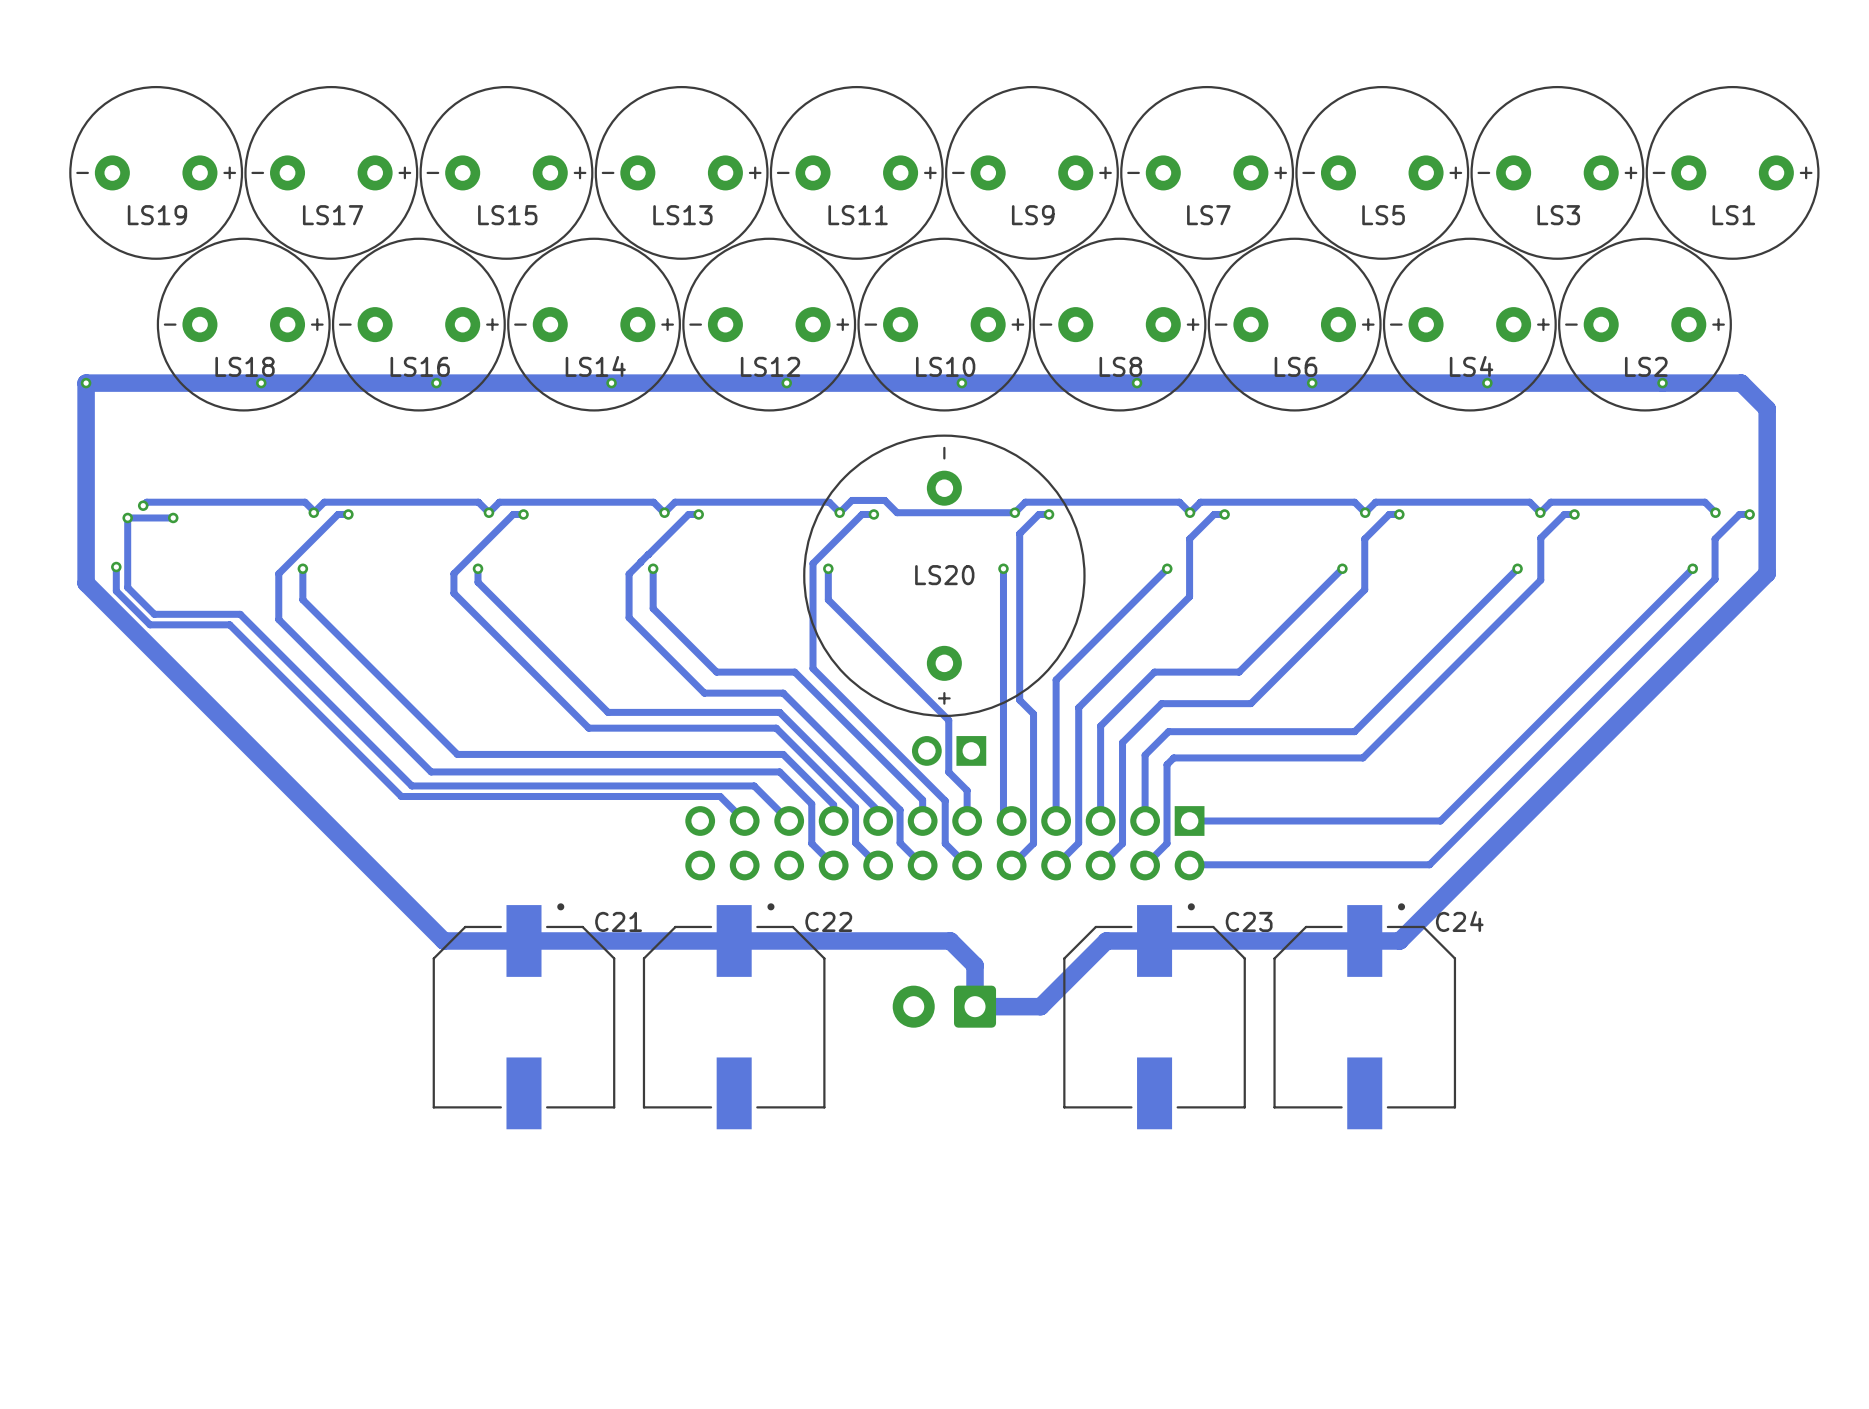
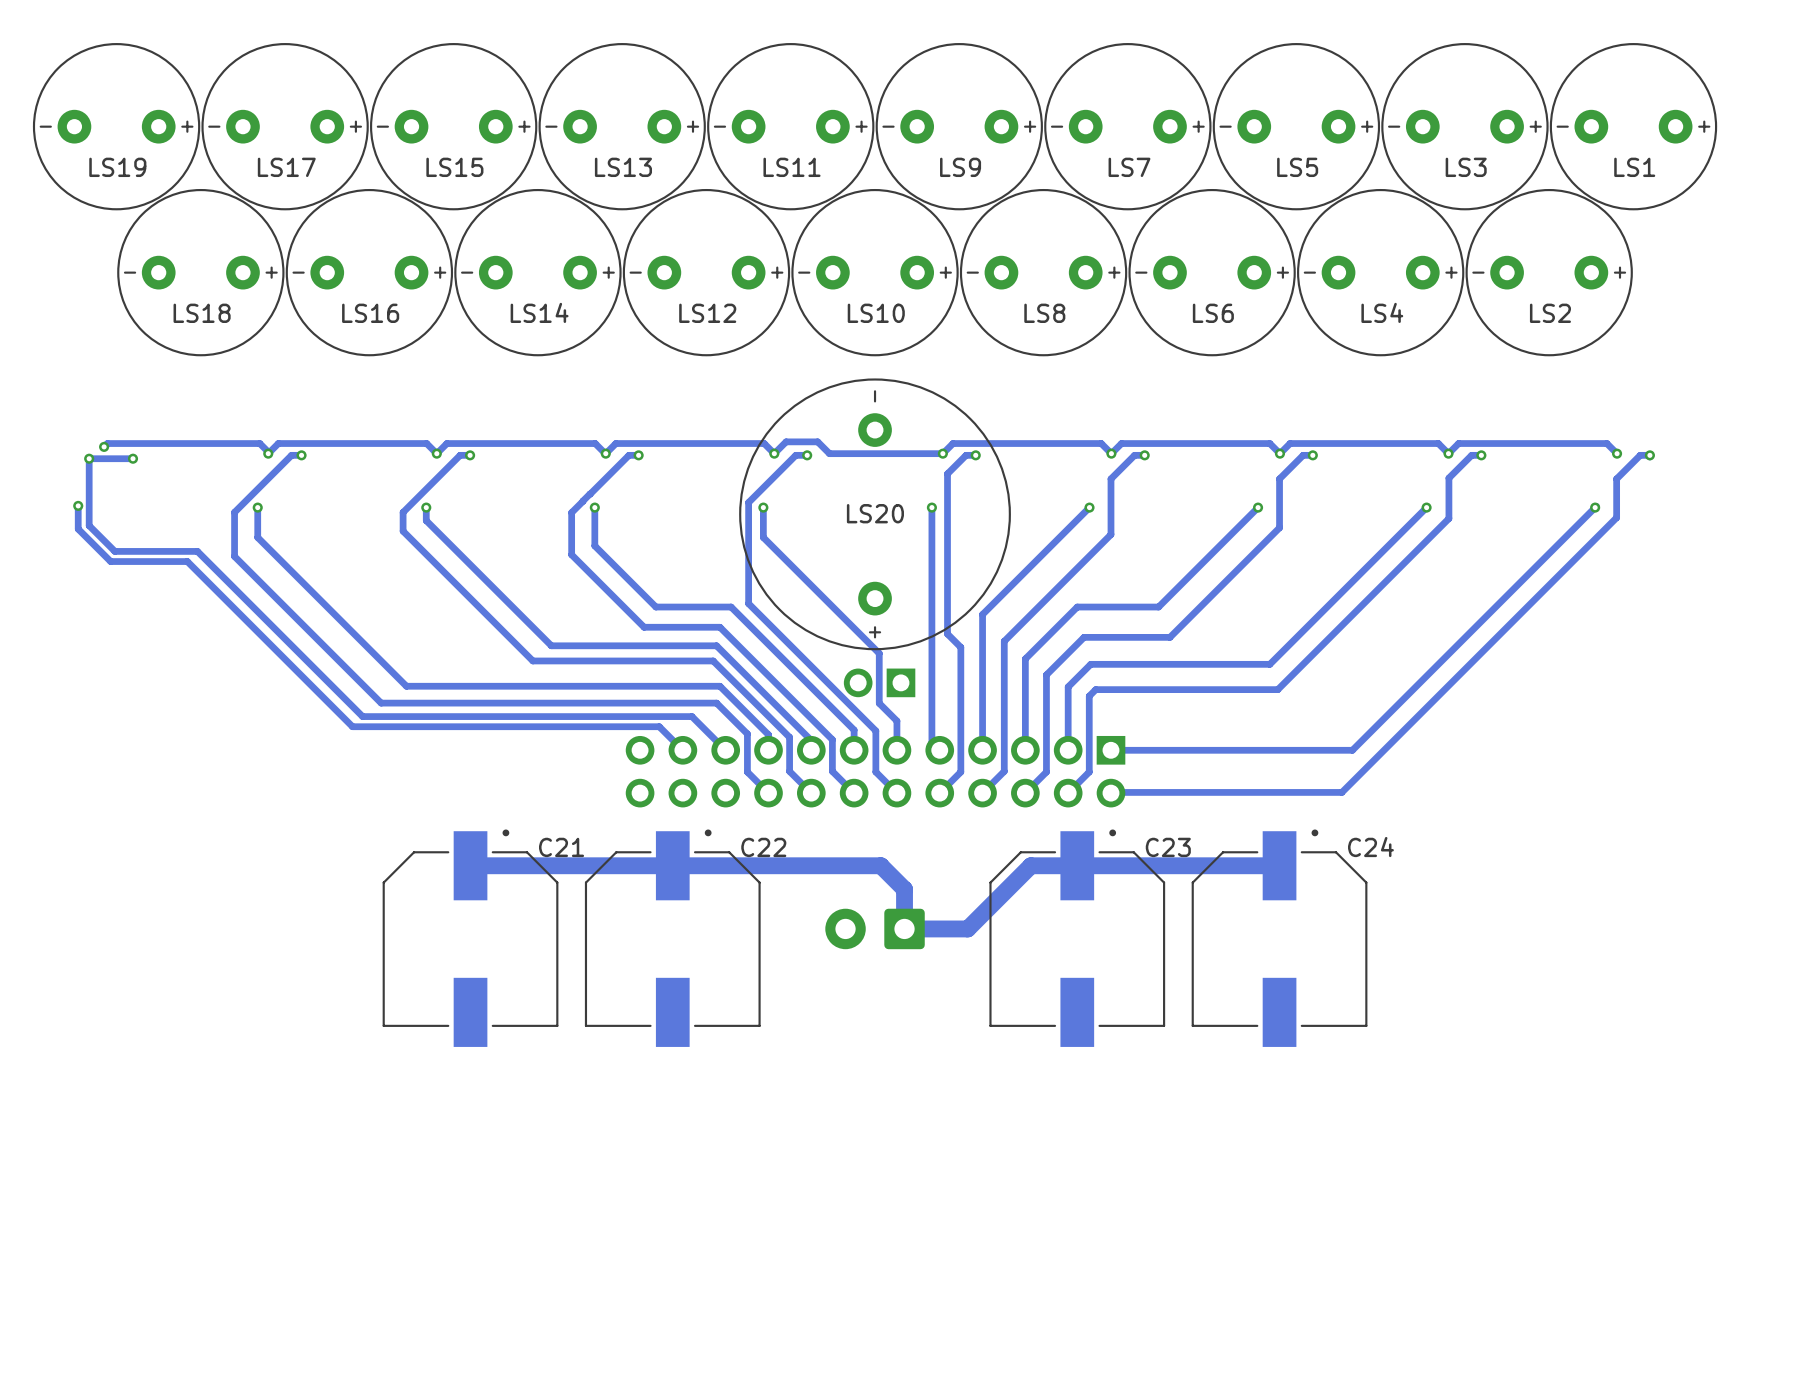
via: (86, 383) -> none
via: (261, 383) -> none
via: (436, 383) -> none
via: (611, 383) -> none
via: (786, 383) -> none
via: (961, 383) -> none
via: (1137, 383) -> none
via: (1312, 383) -> none
via: (1487, 383) -> none
via: (1662, 383) -> none
track: (1364, 940) (1399, 940) (1767, 573) (1767, 408) (1741, 383) (86, 383) (86, 583) (443, 940) (523, 940) -> none

